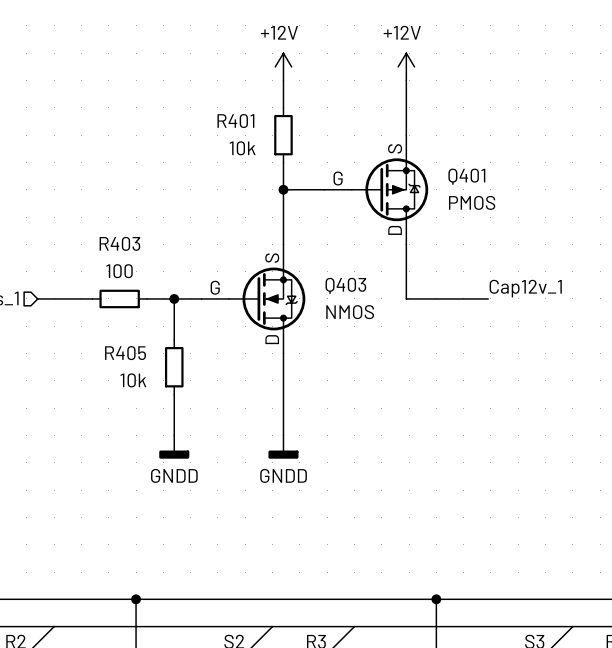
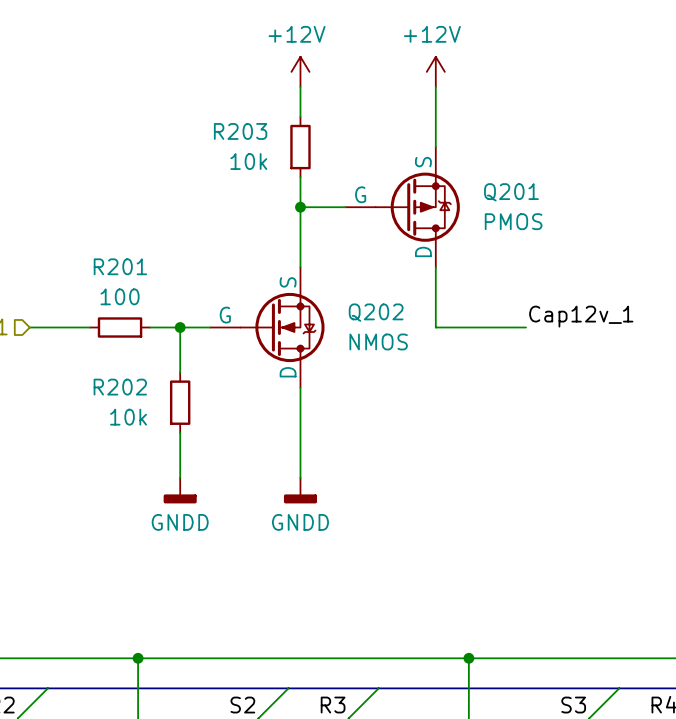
R401 name: R401 (235, 121) -> R203 (240, 131)
Q401 name: Q401 (466, 176) -> Q201 (511, 192)
R403 name: R403 (119, 243) -> R201 (120, 266)
Q403 name: Q403 (345, 285) -> Q202 (376, 312)
R405 name: R405 (125, 353) -> R202 (120, 387)

